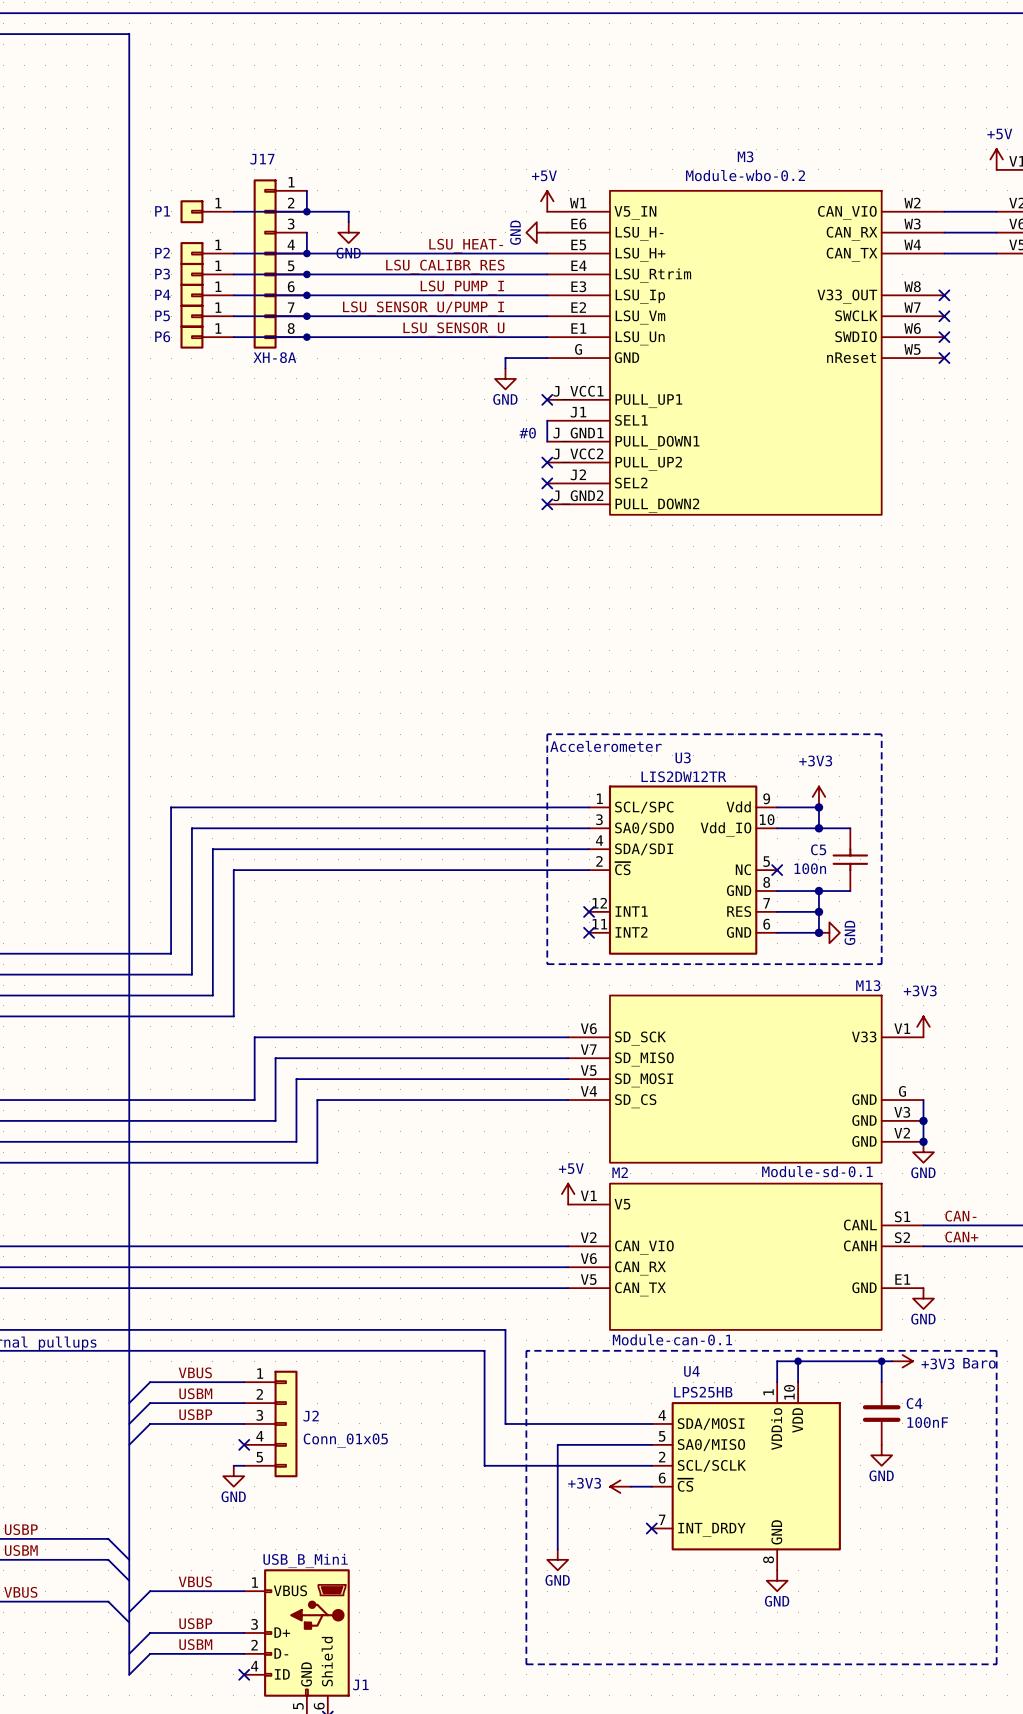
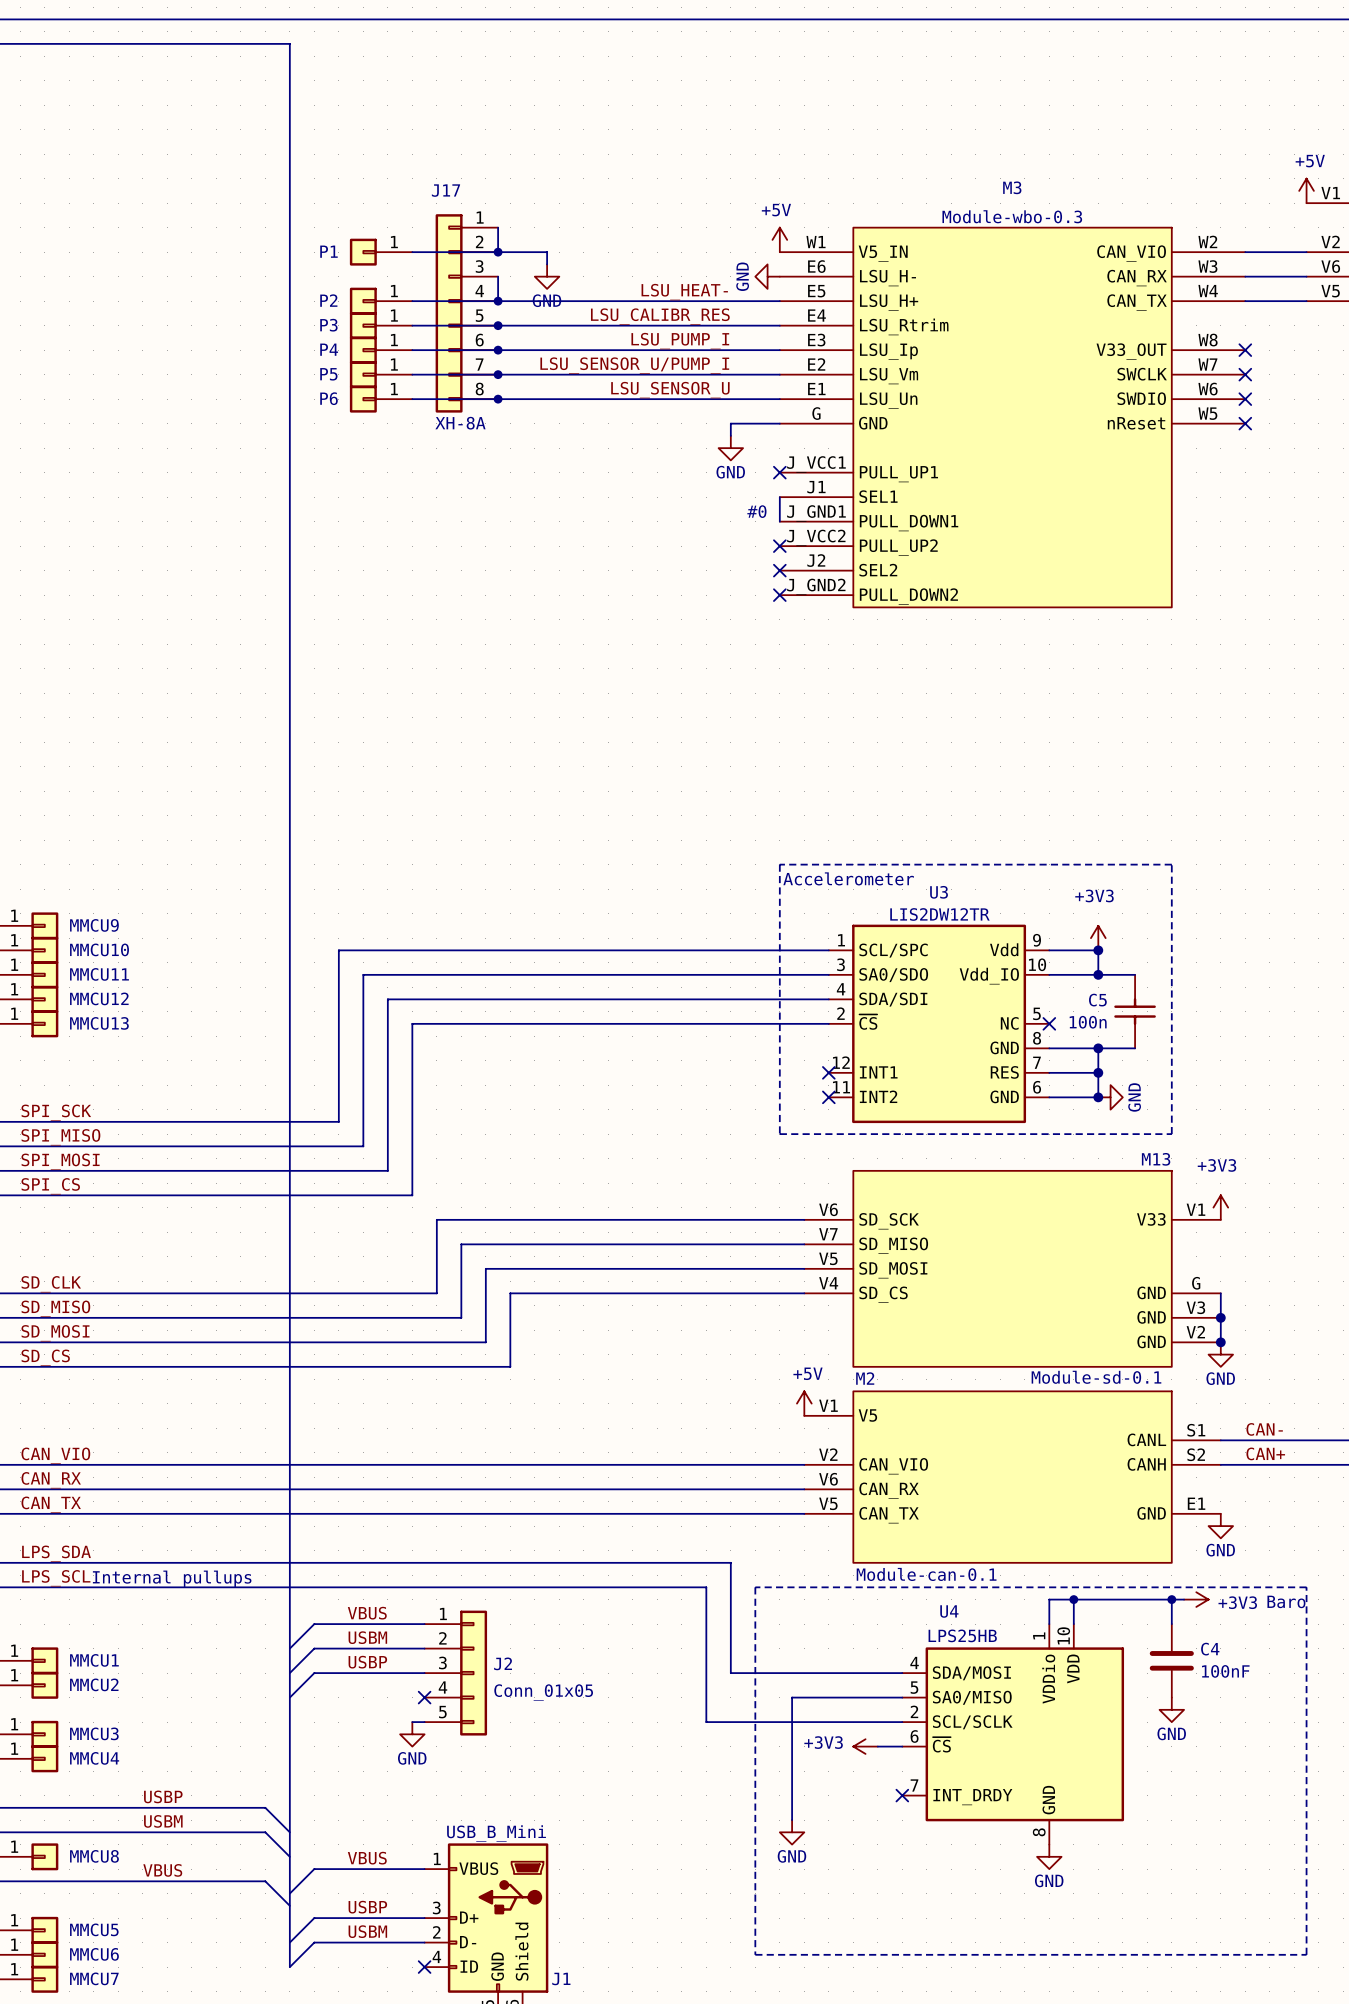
M3 value: Module-wbo-0.2 (745, 175) -> Module-wbo-0.3 (1012, 216)

